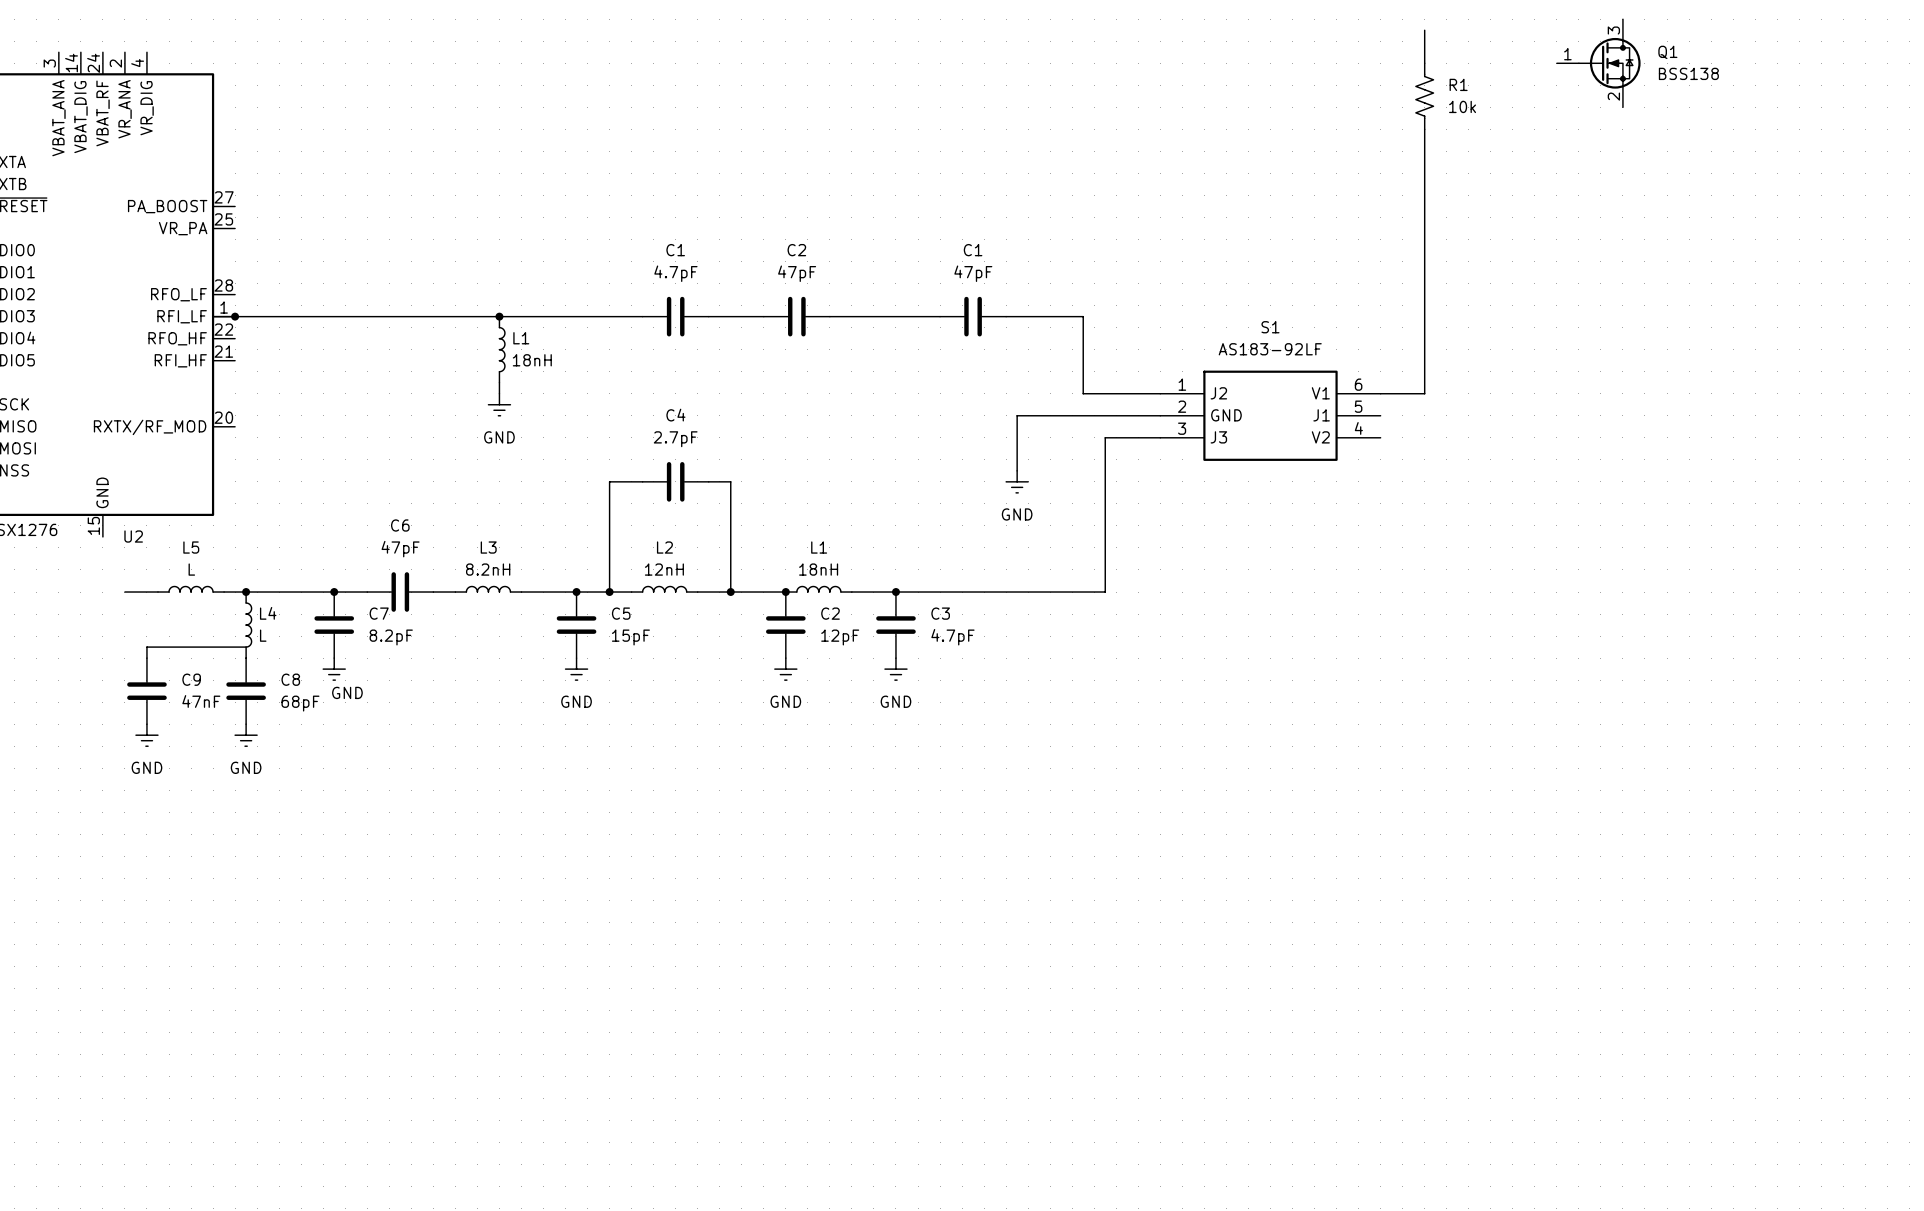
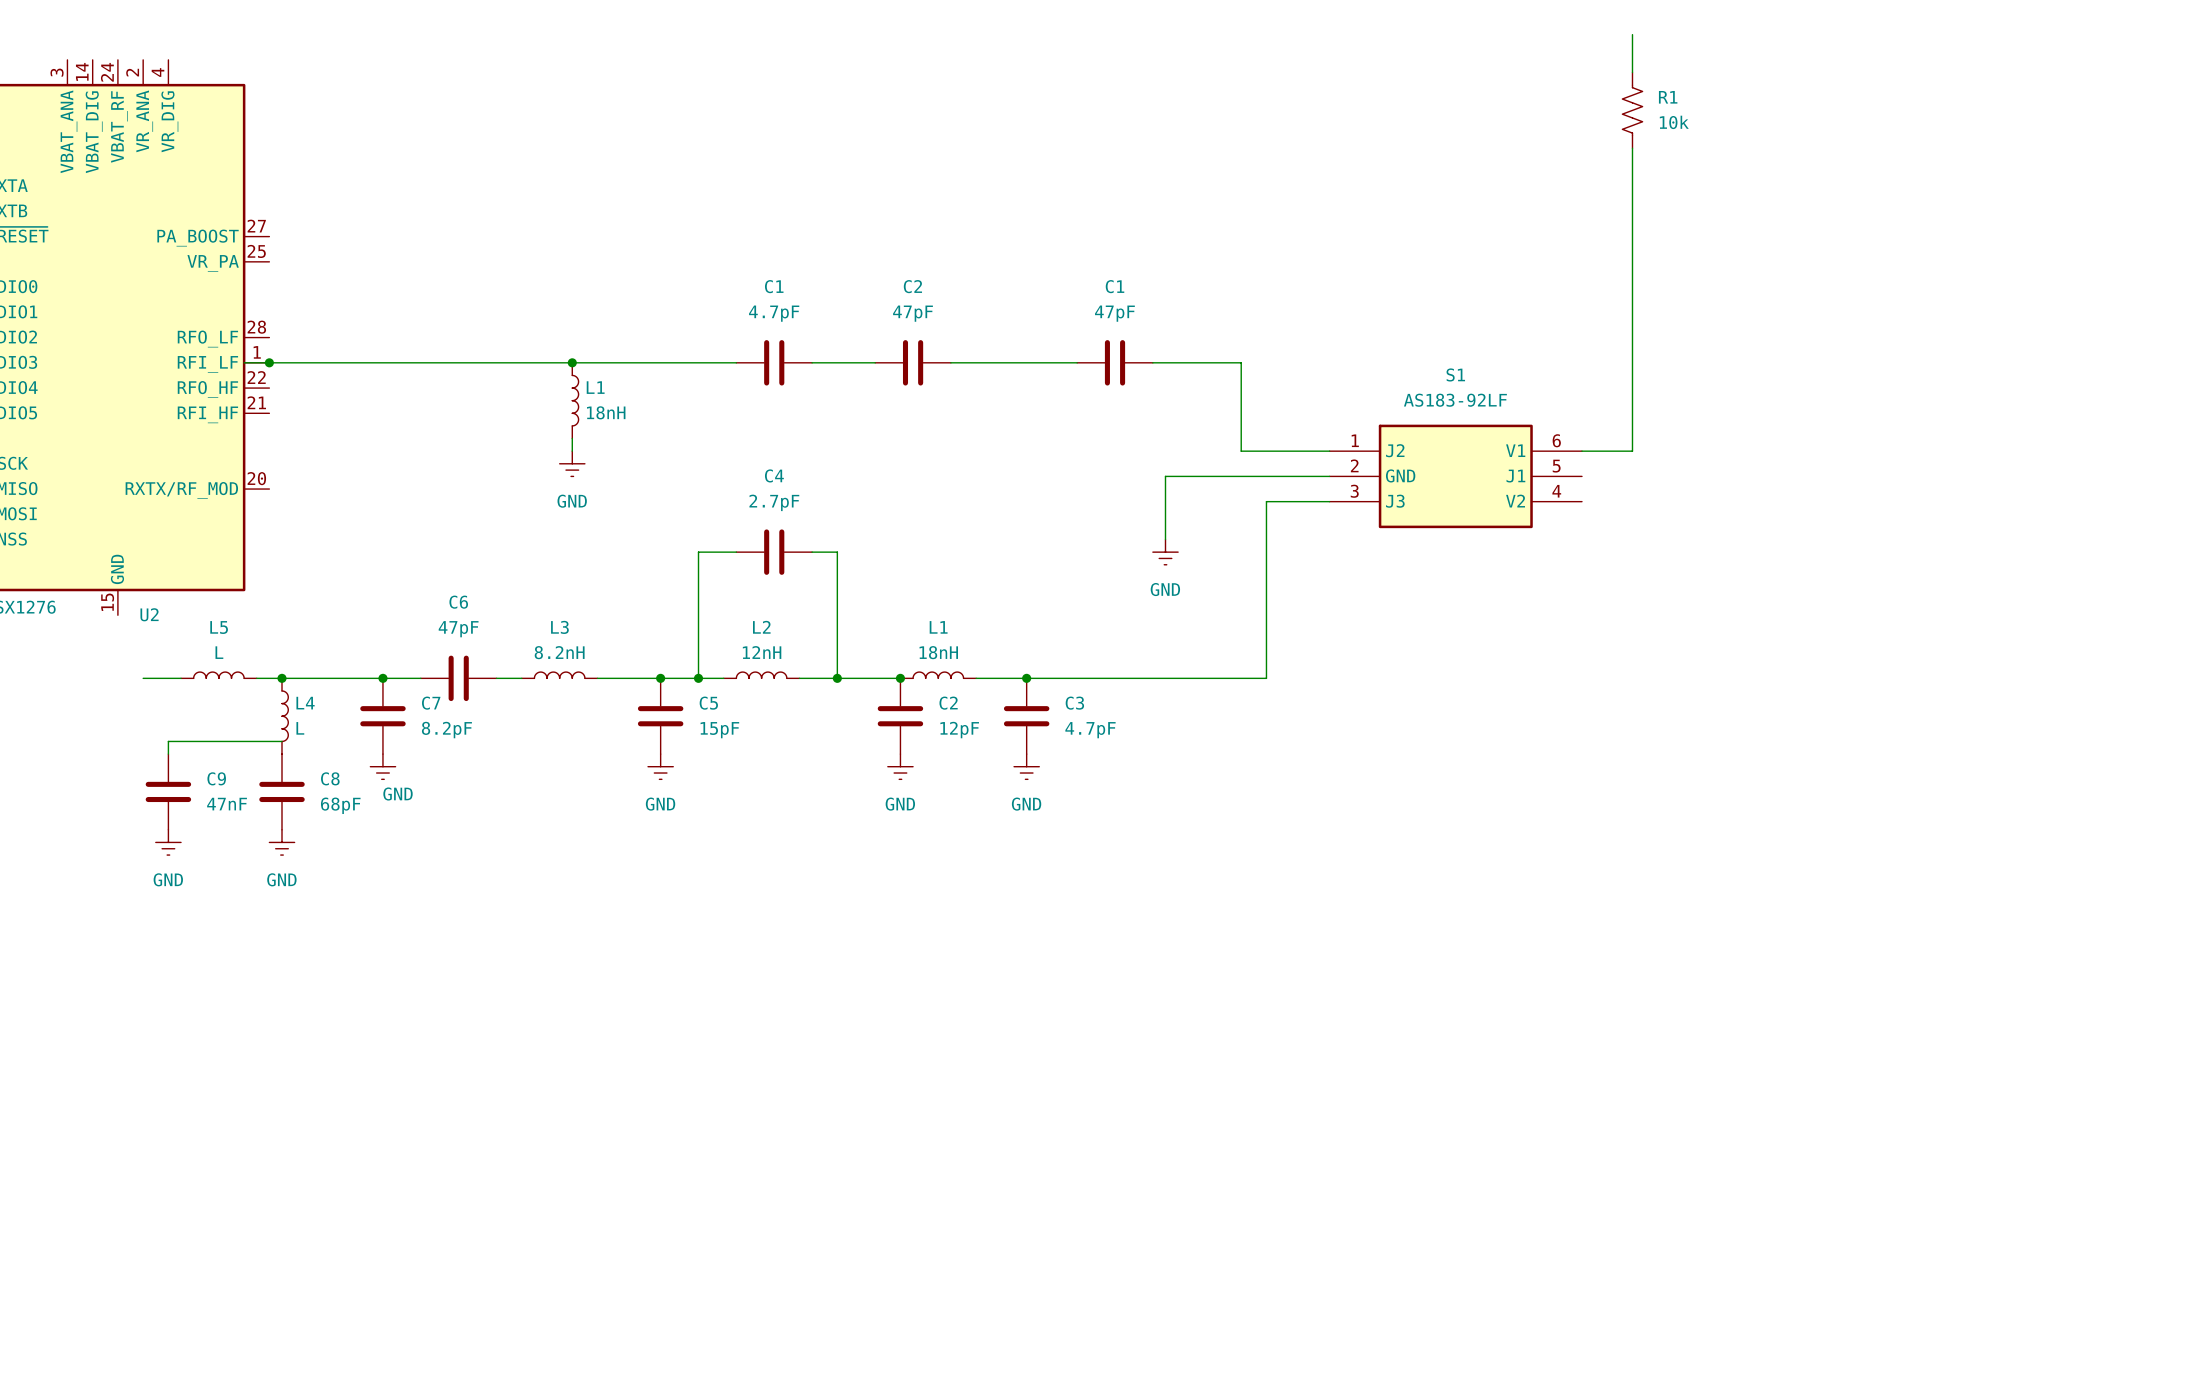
Q1: BSS138 (1598, 63) -> none

